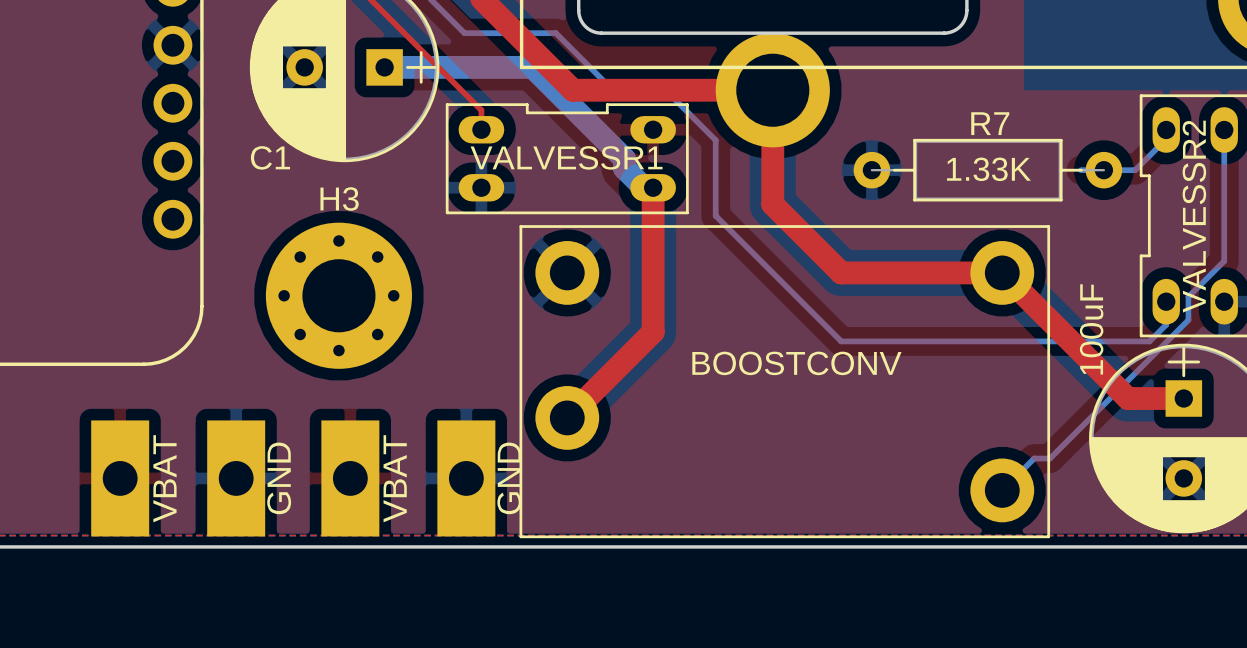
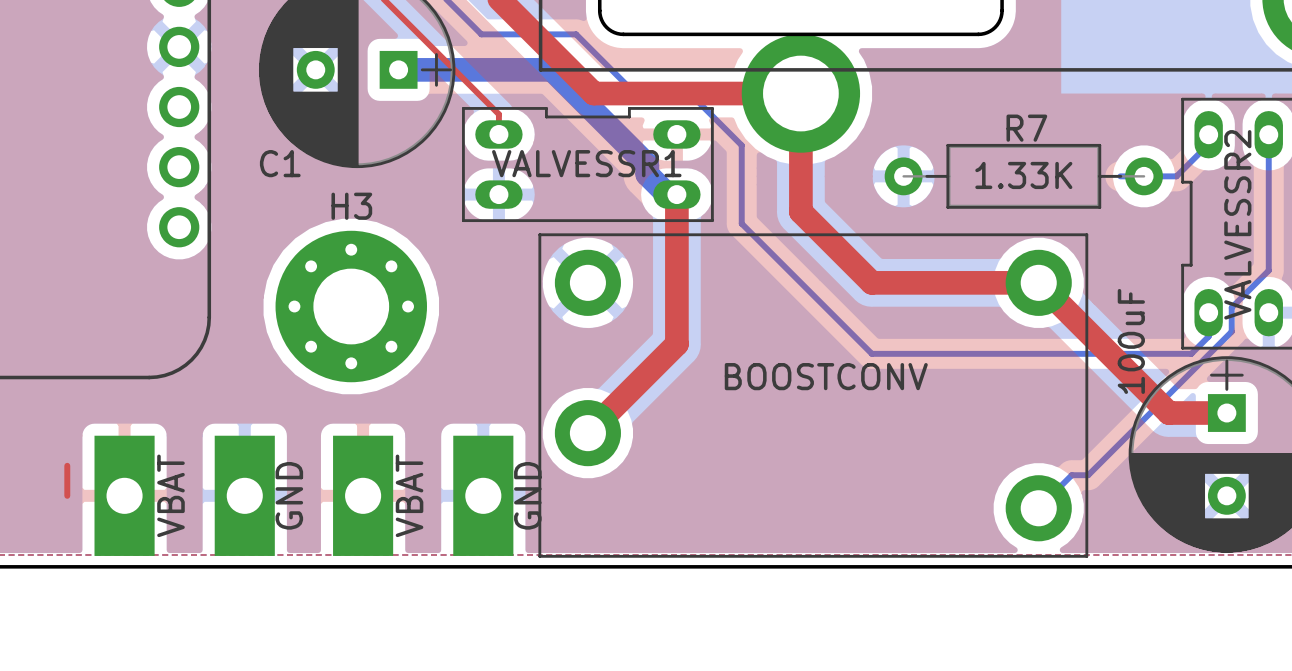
top track: none -> (67, 465) (67, 495)

